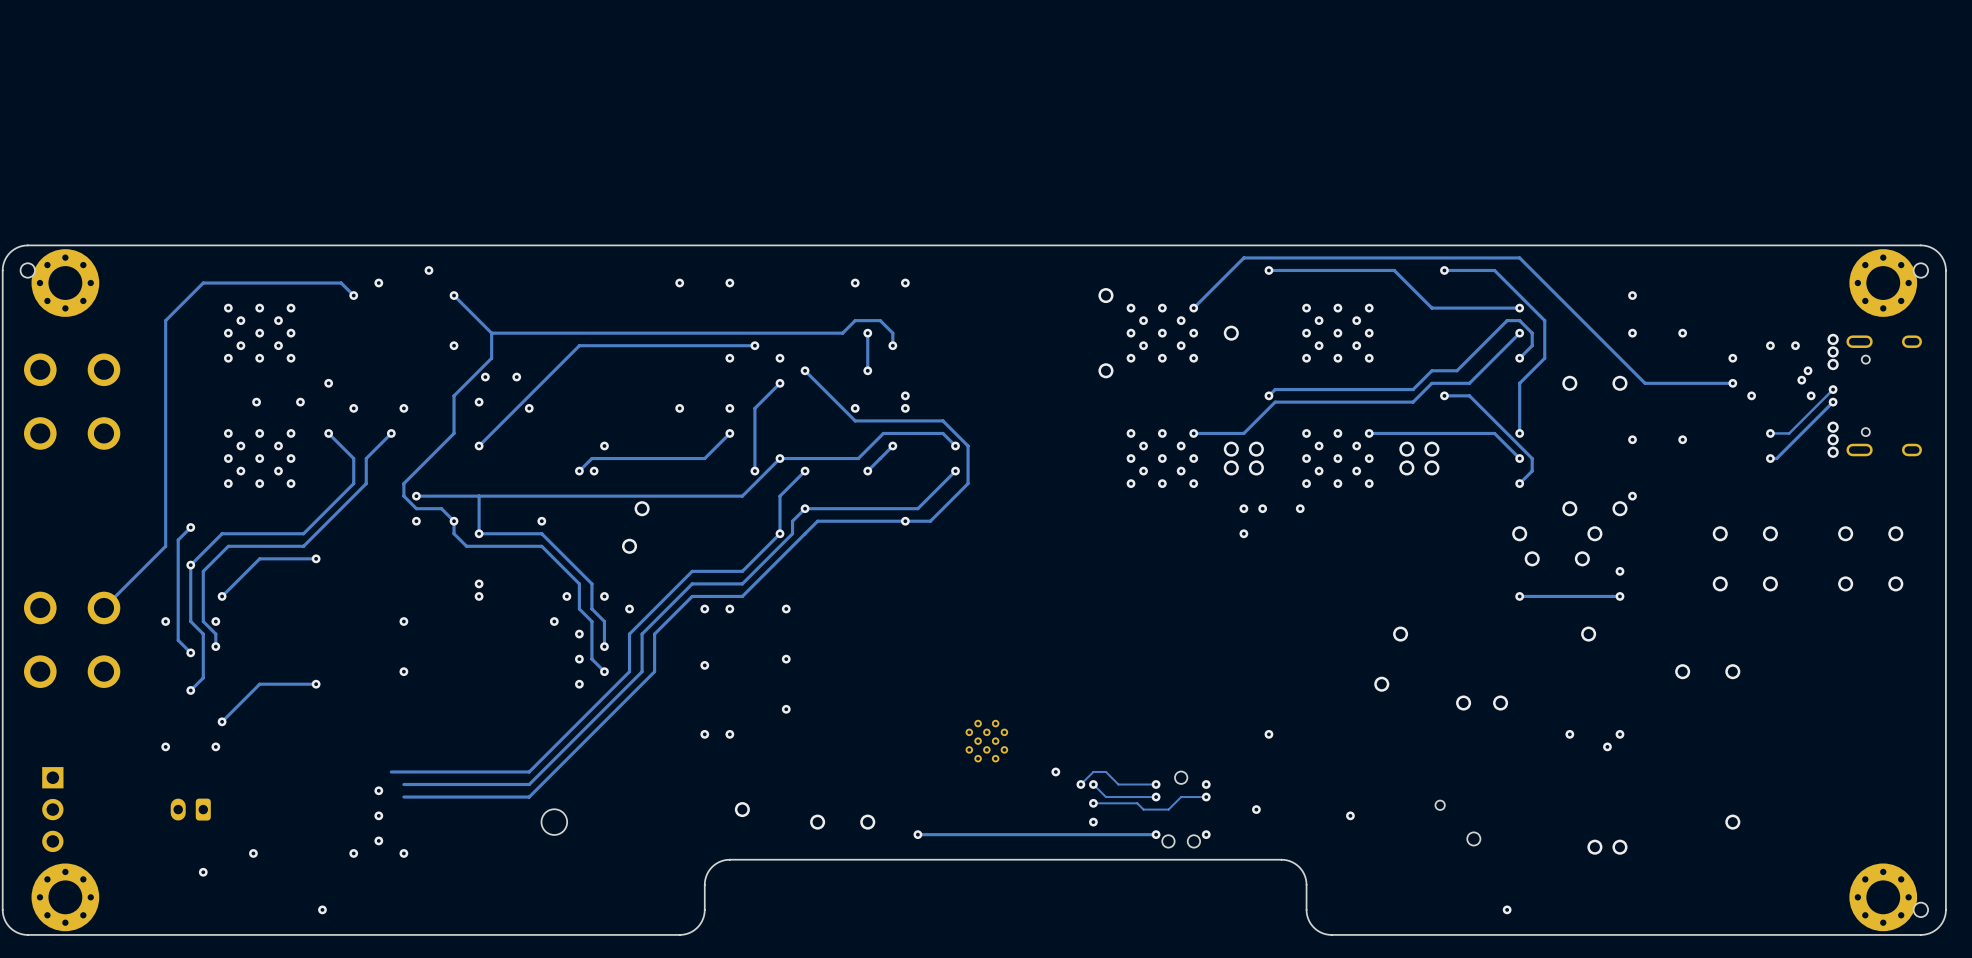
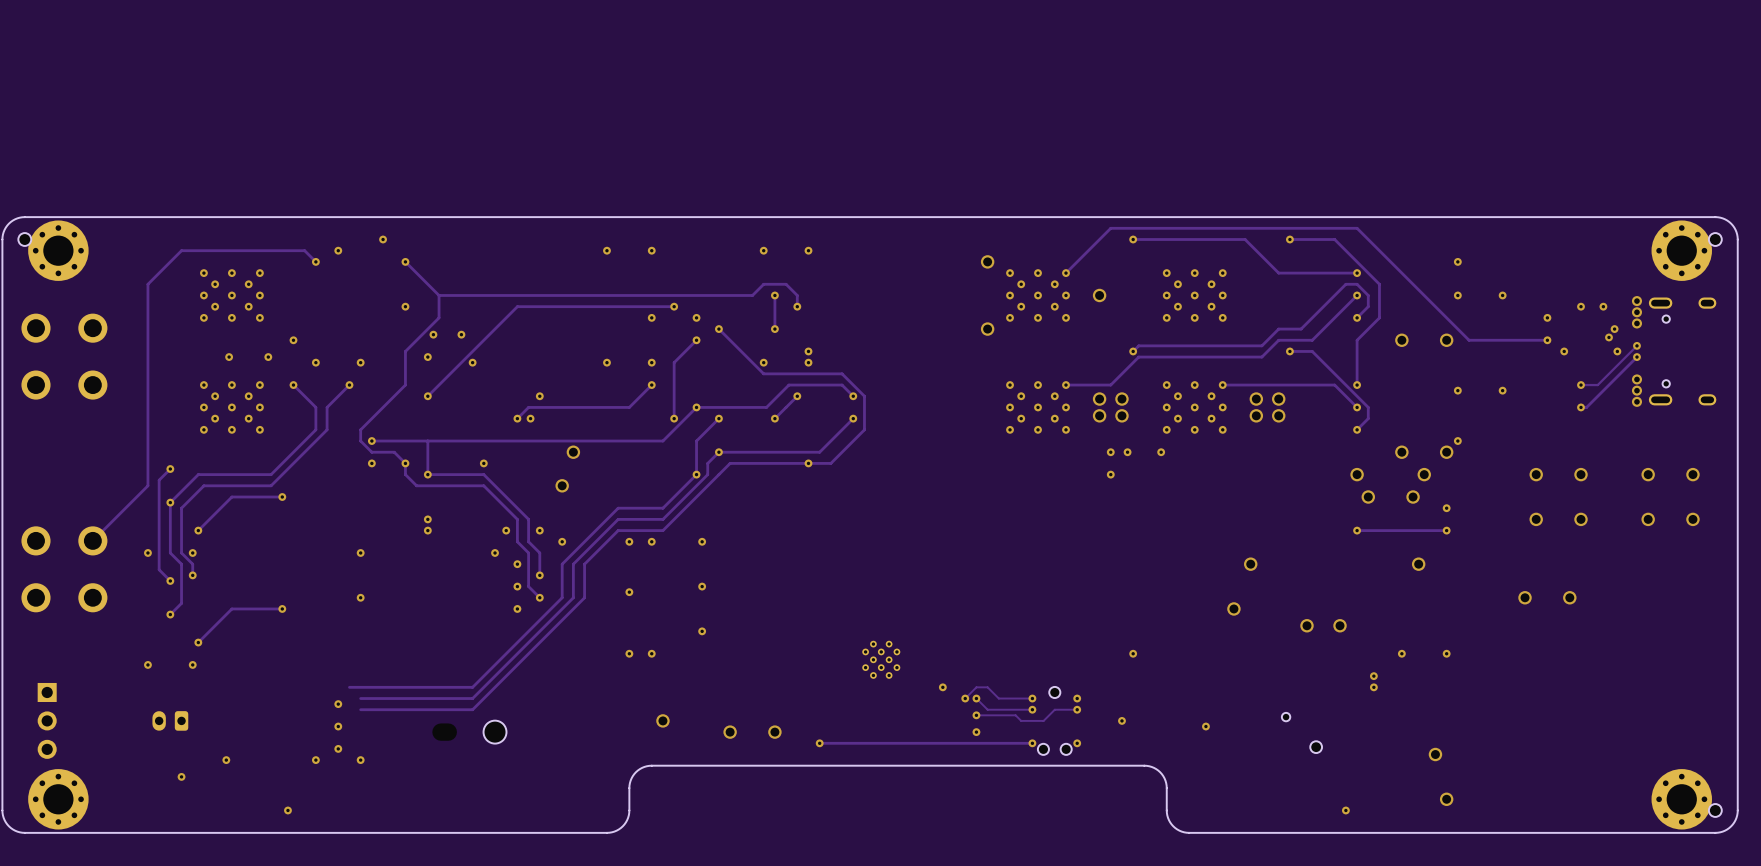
via: (1682, 671) -> none
via: none -> (1525, 597)
via: (1732, 671) -> none
via: none -> (1569, 597)
via: (1607, 746) -> none
via: none -> (1373, 676)
via: none -> (1373, 687)
via: (1732, 822) -> none
via: (1594, 847) -> none
via: none -> (1435, 754)
via: (1619, 847) -> none
via: none -> (1446, 799)

